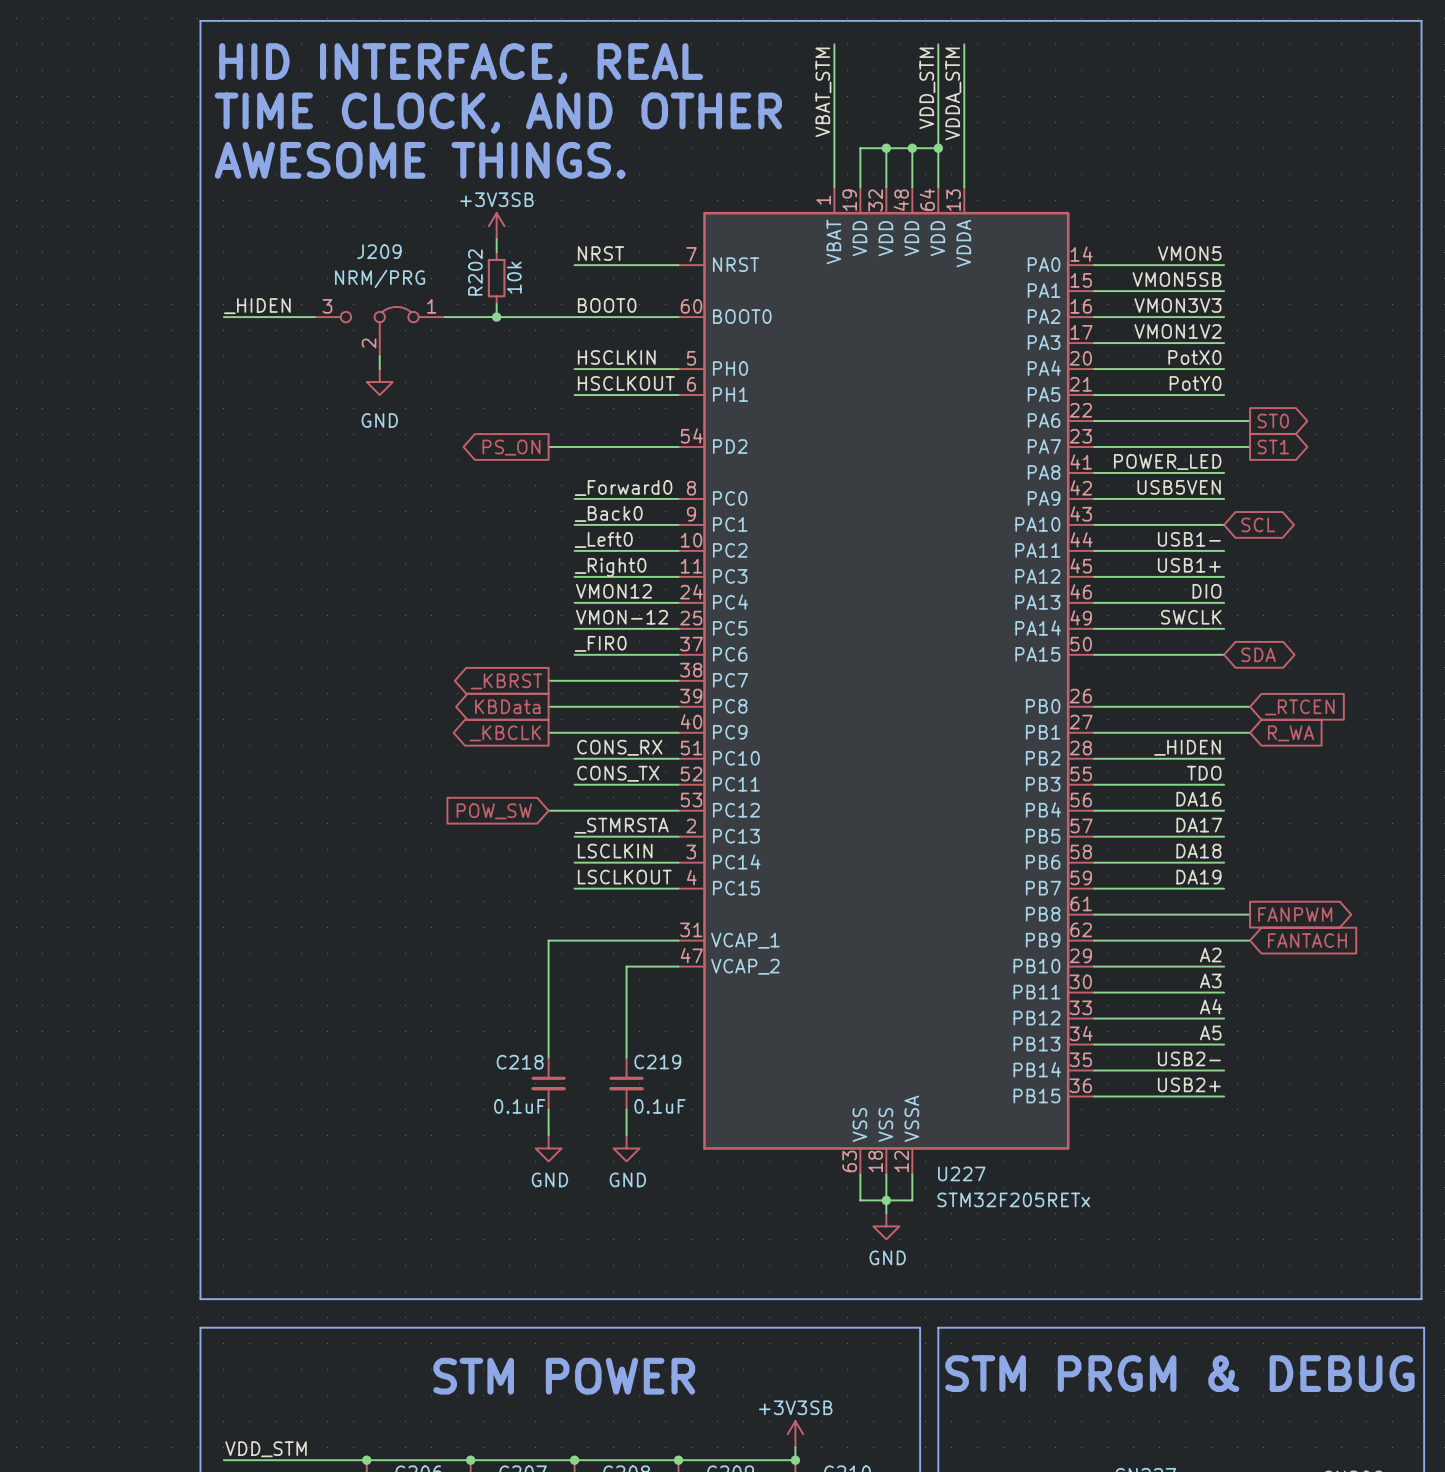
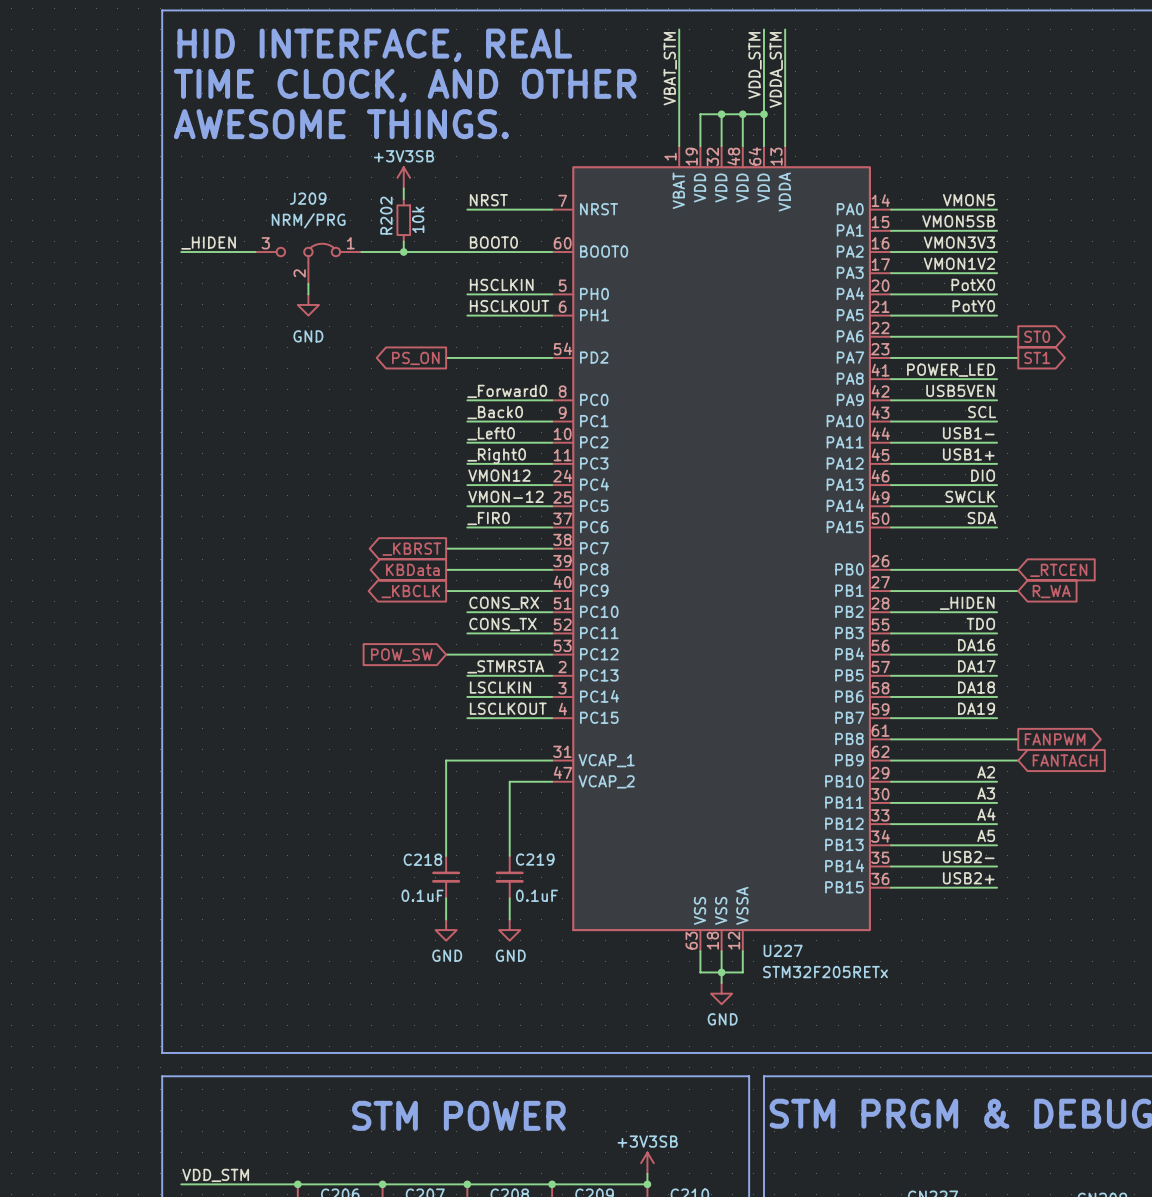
label: none -> SCL (982, 412)
global label: SCL (1258, 524) -> none
label: none -> SDA (981, 518)
global label: SDA (1258, 654) -> none

